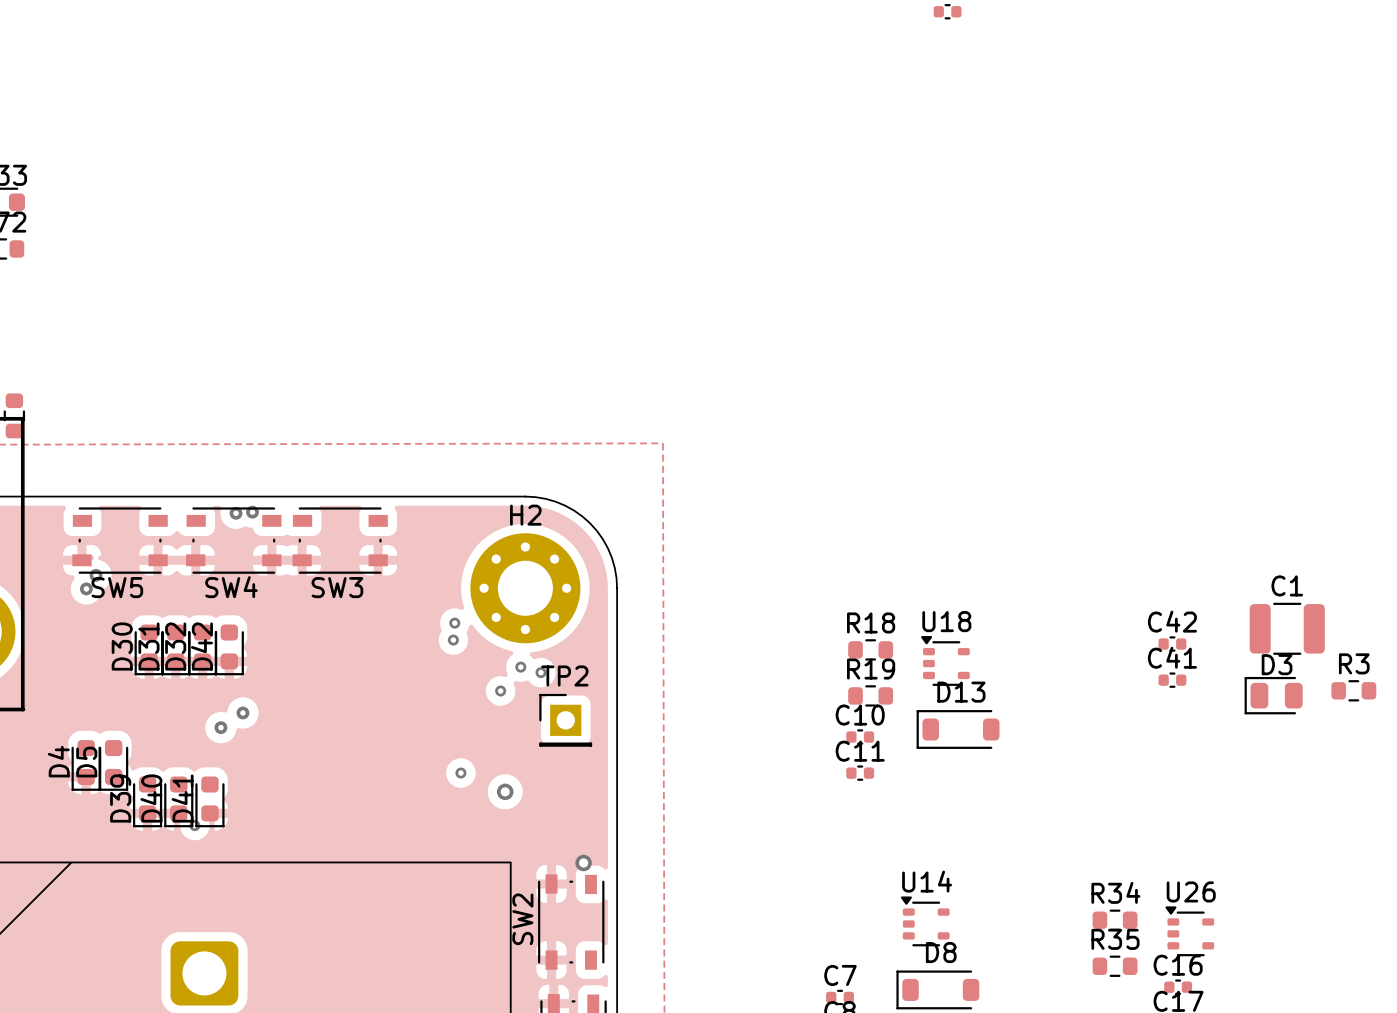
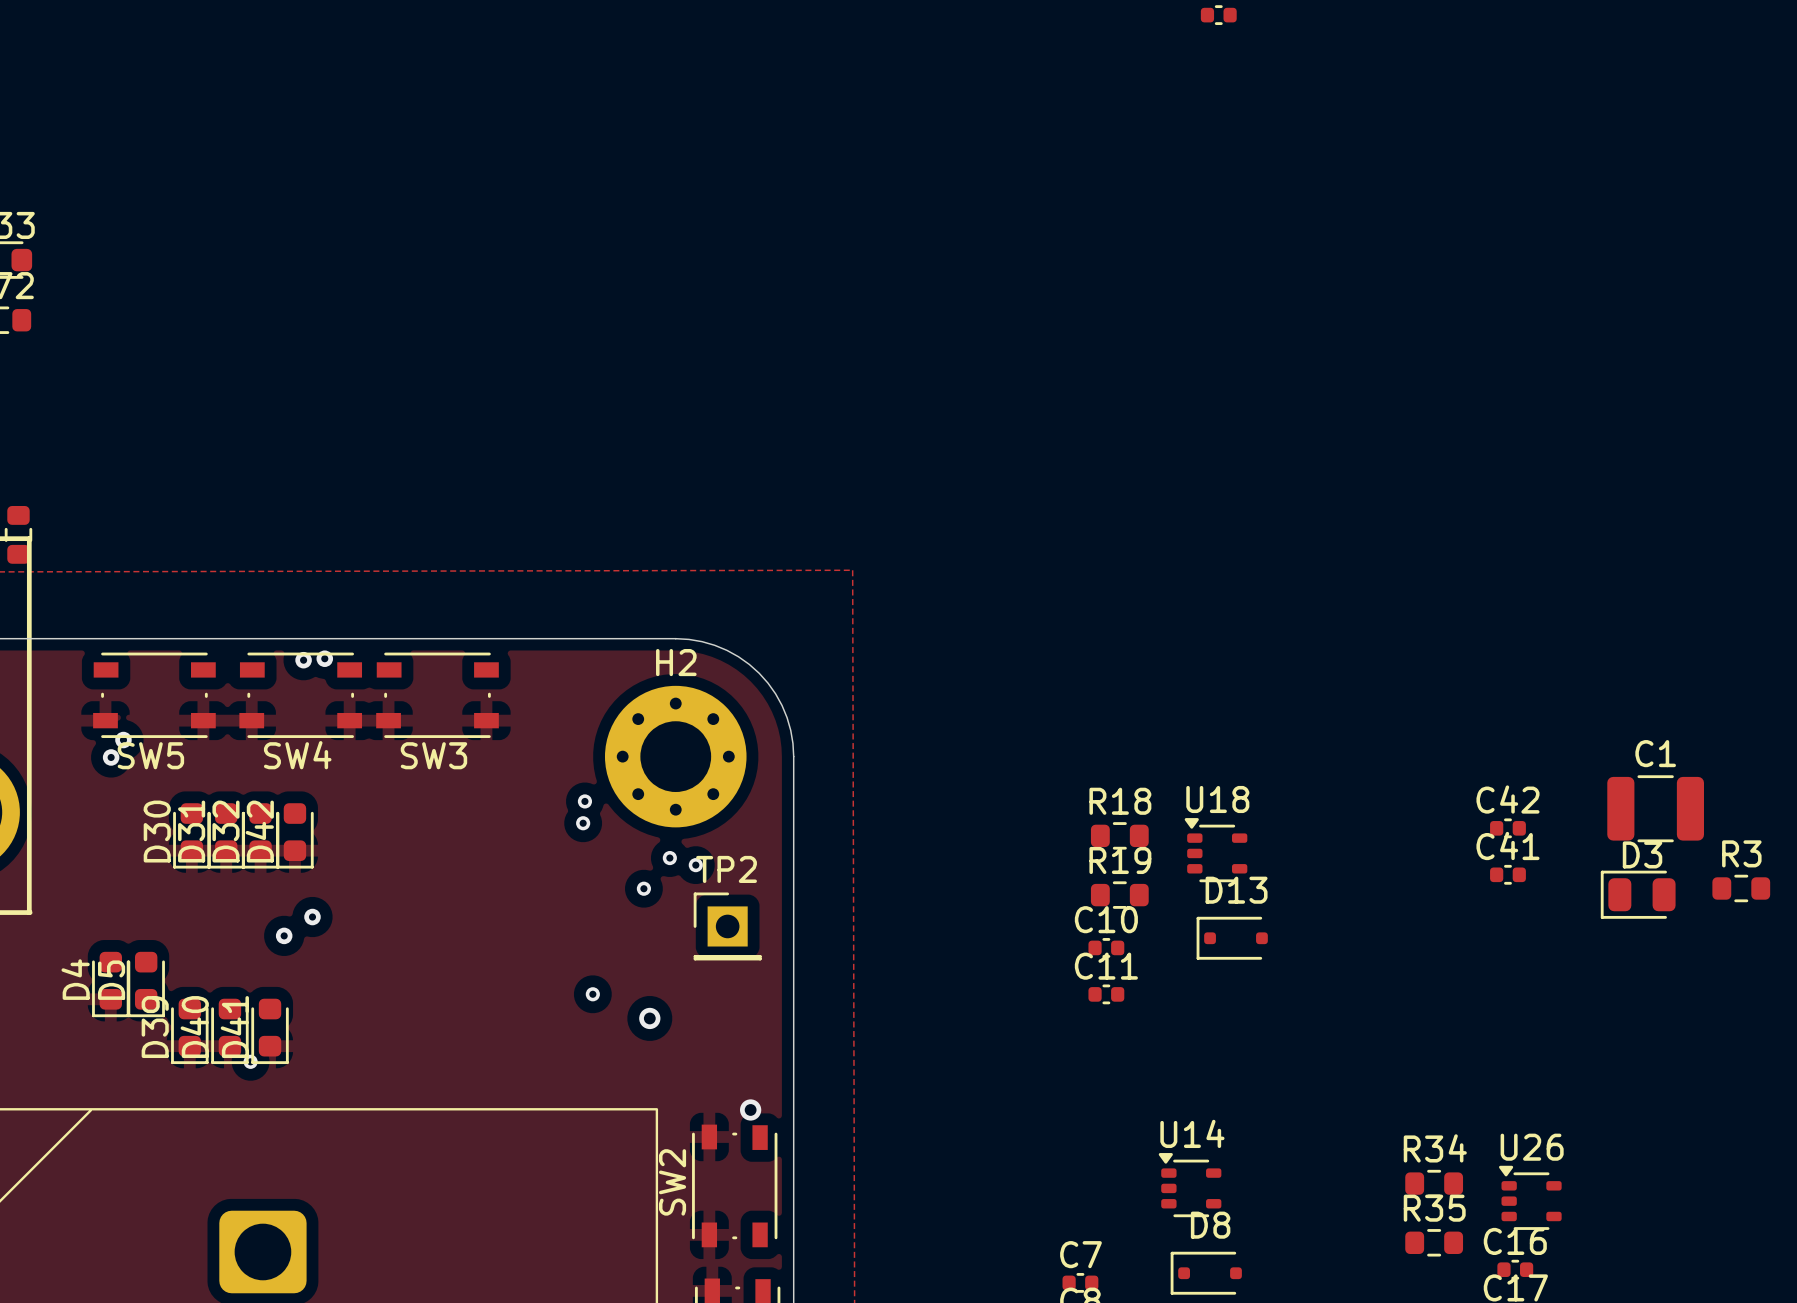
D13 footprint: [916, 710, 1000, 749] -> [1196, 916, 1268, 960]
D8 footprint: [896, 970, 980, 1010] -> [1170, 1251, 1242, 1295]

